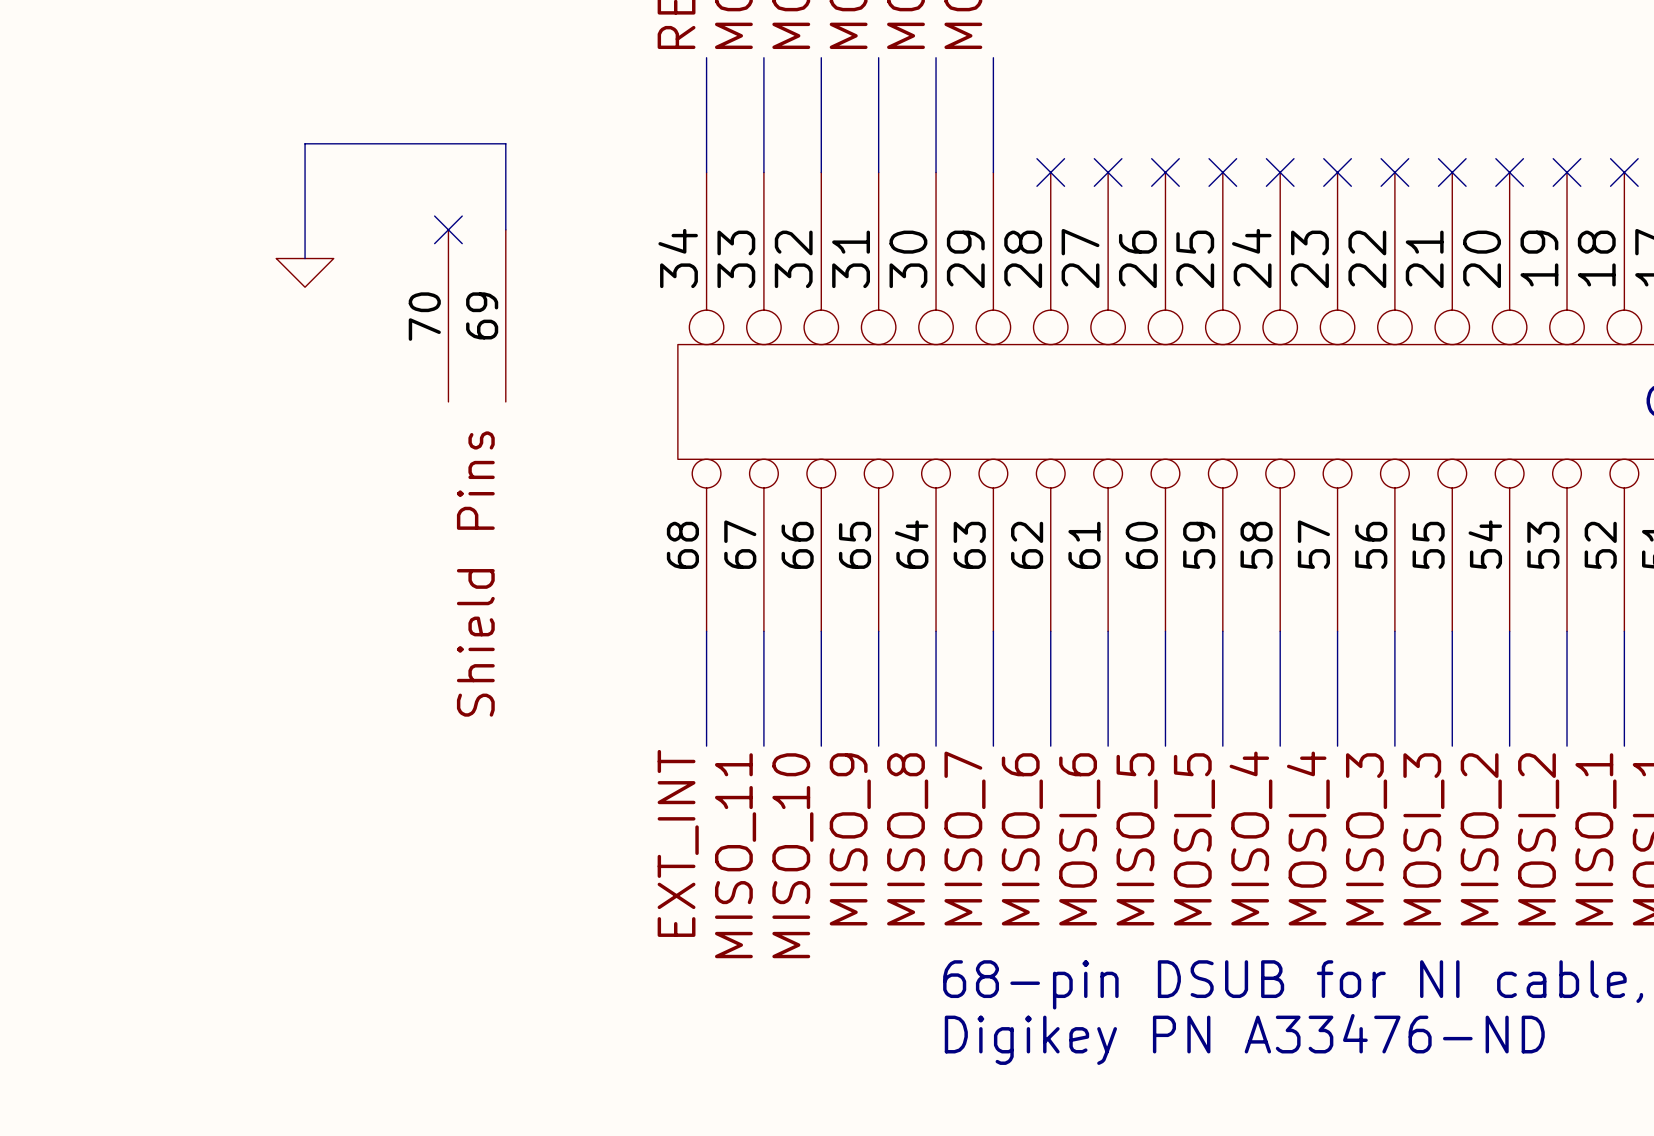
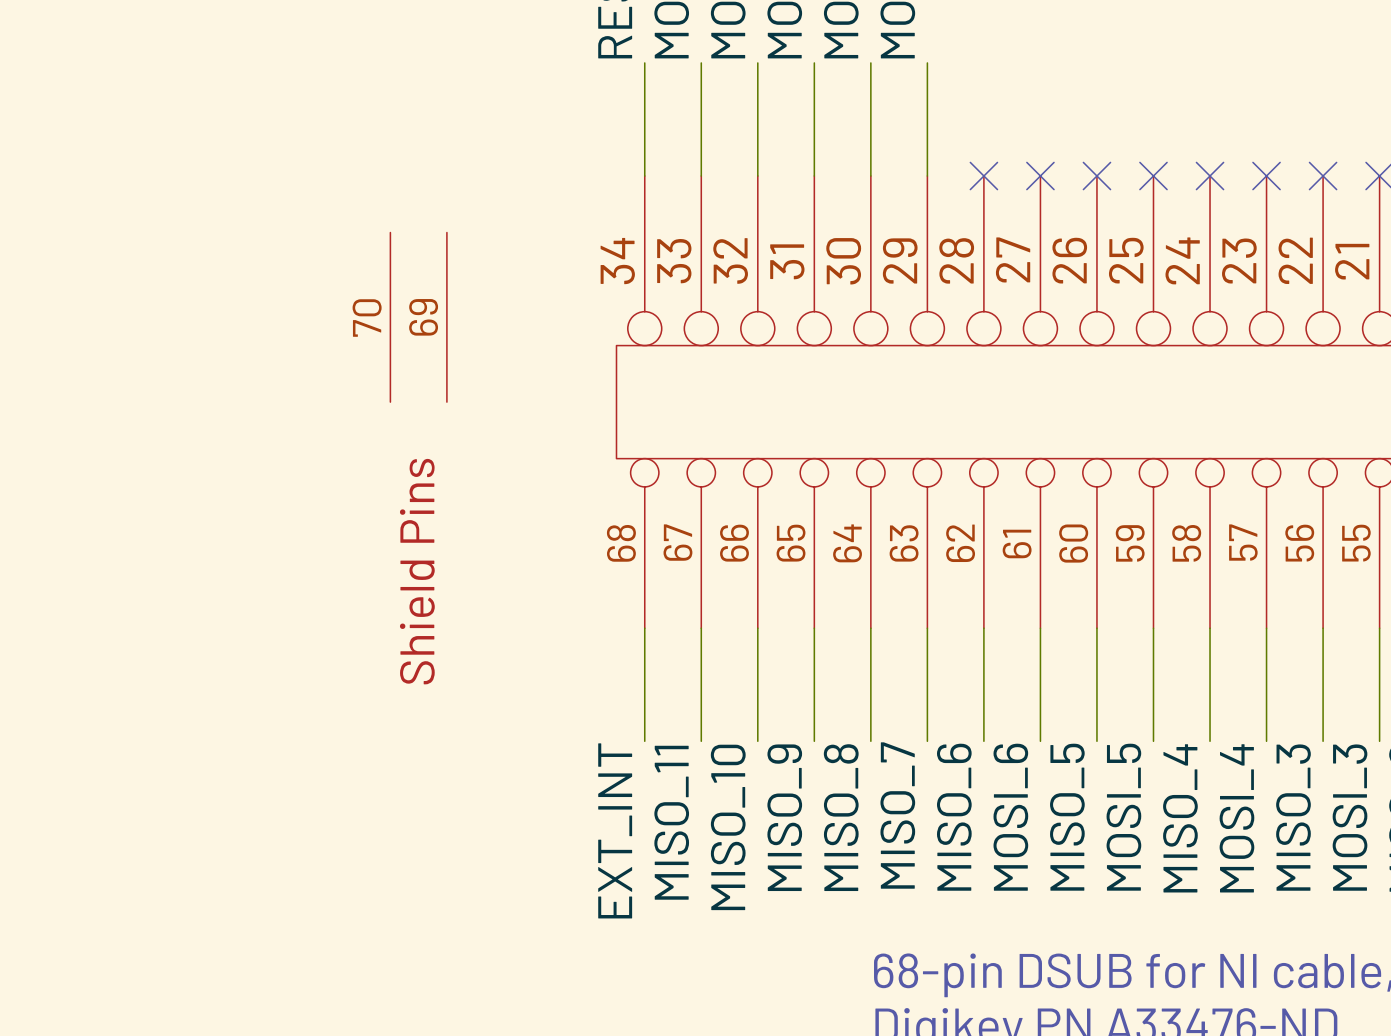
no-connect mark: (448, 229) -> none
wire: (505, 229) (505, 143) (305, 143) (305, 258) -> none
power symbol: (305, 272) -> none

